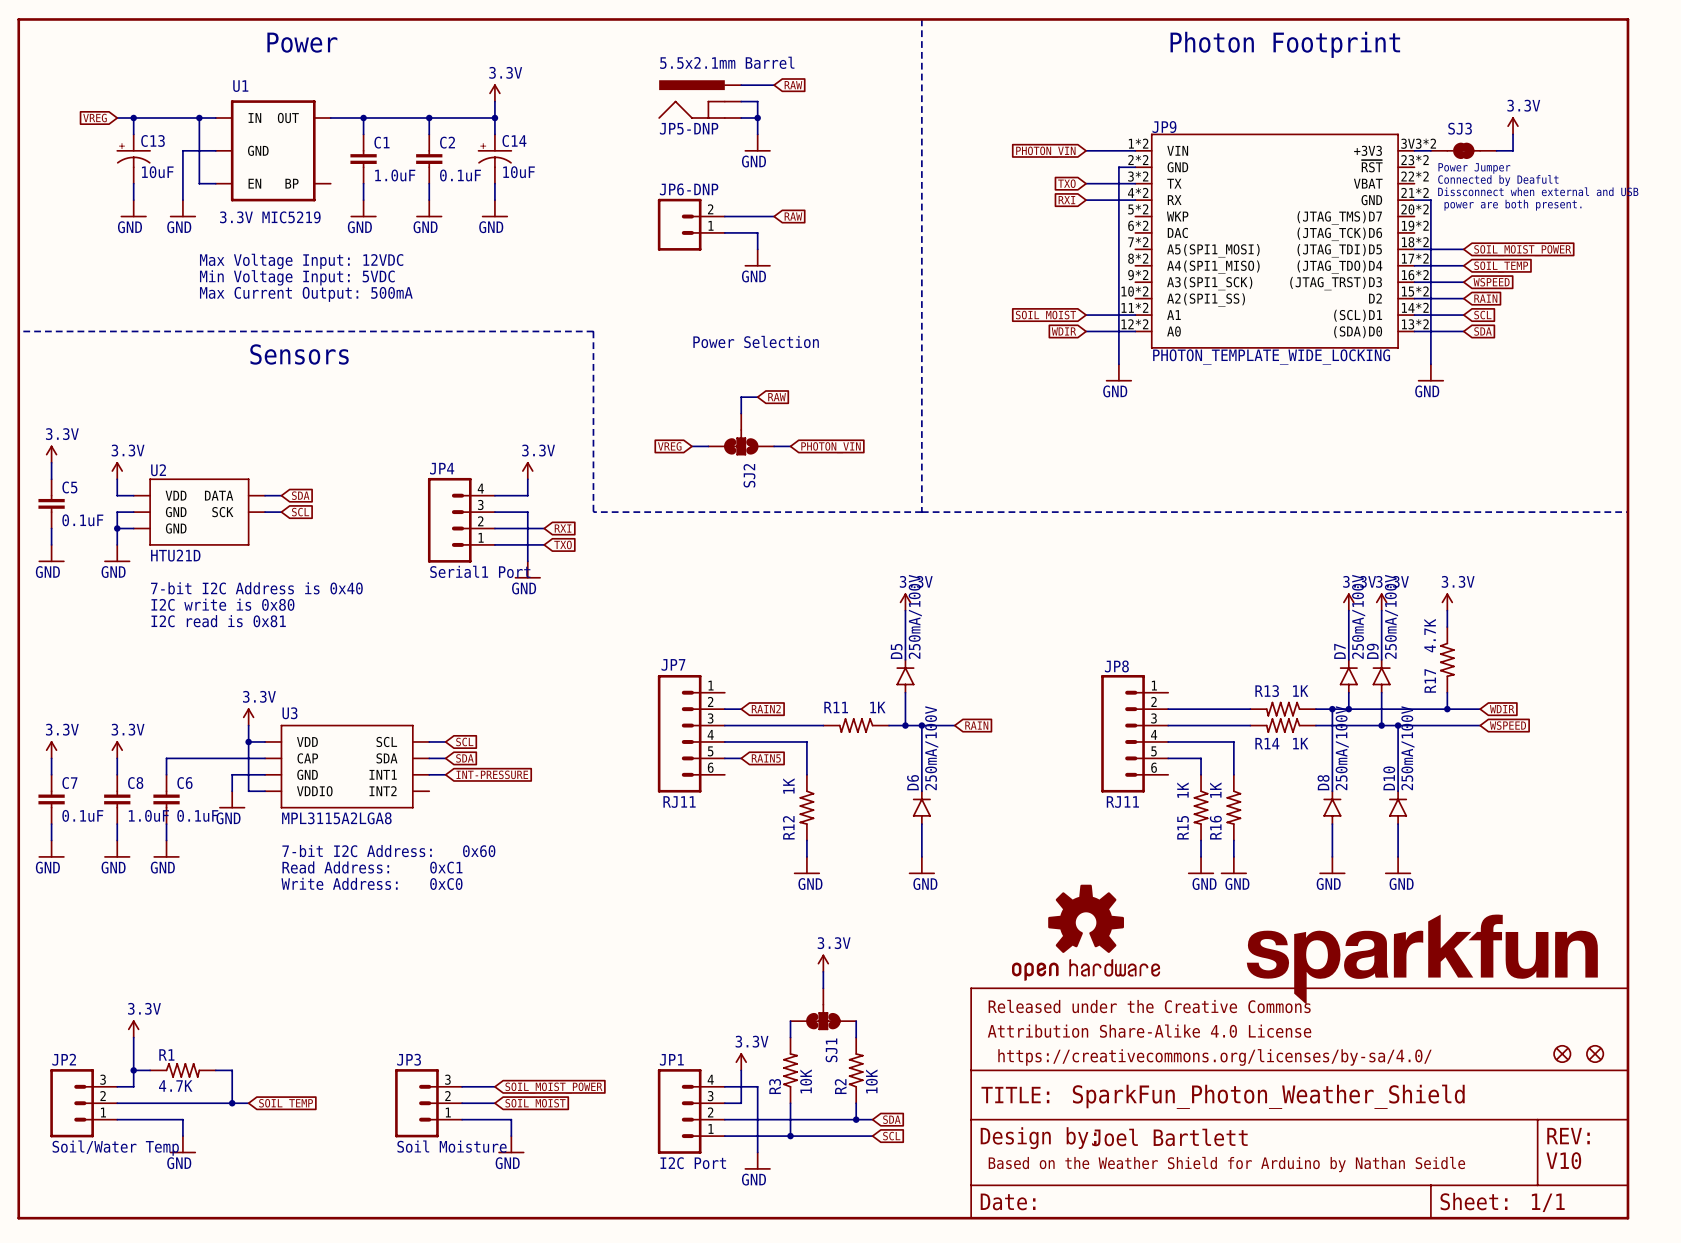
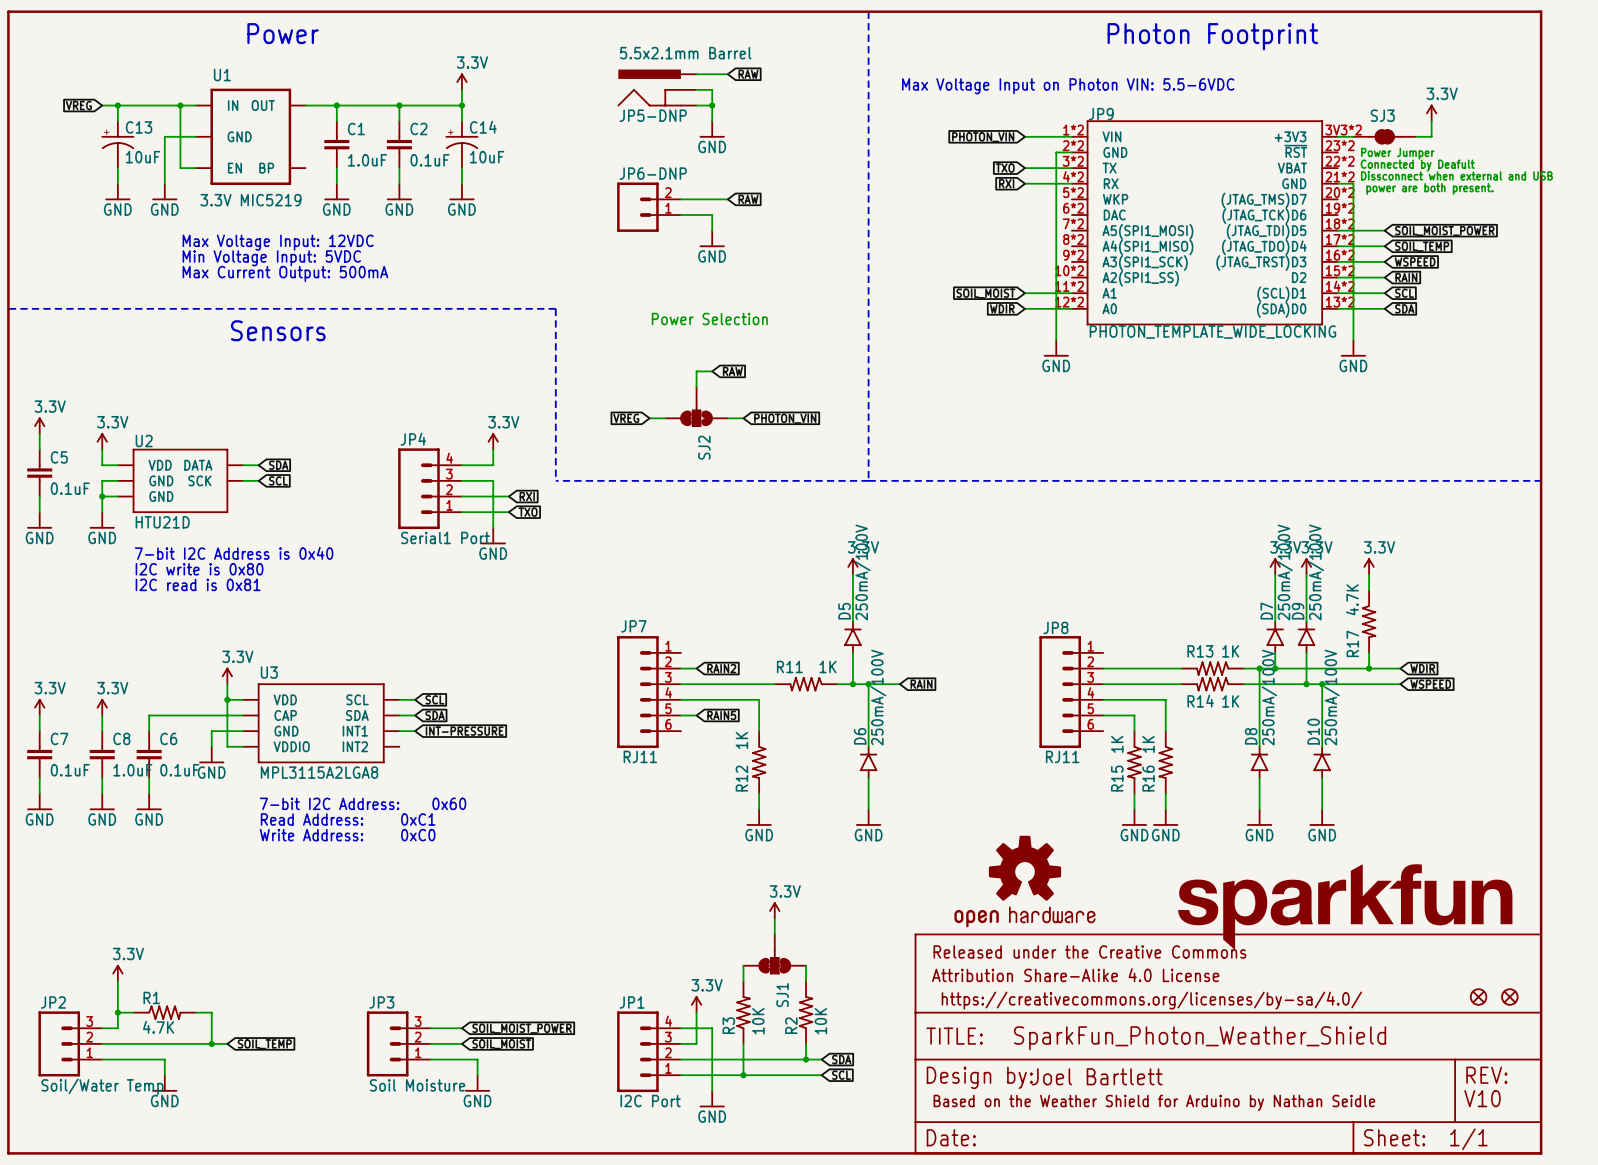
text: none -> Max Voltage Input on Photon VIN: 5.5-6VDC (1068, 86)

